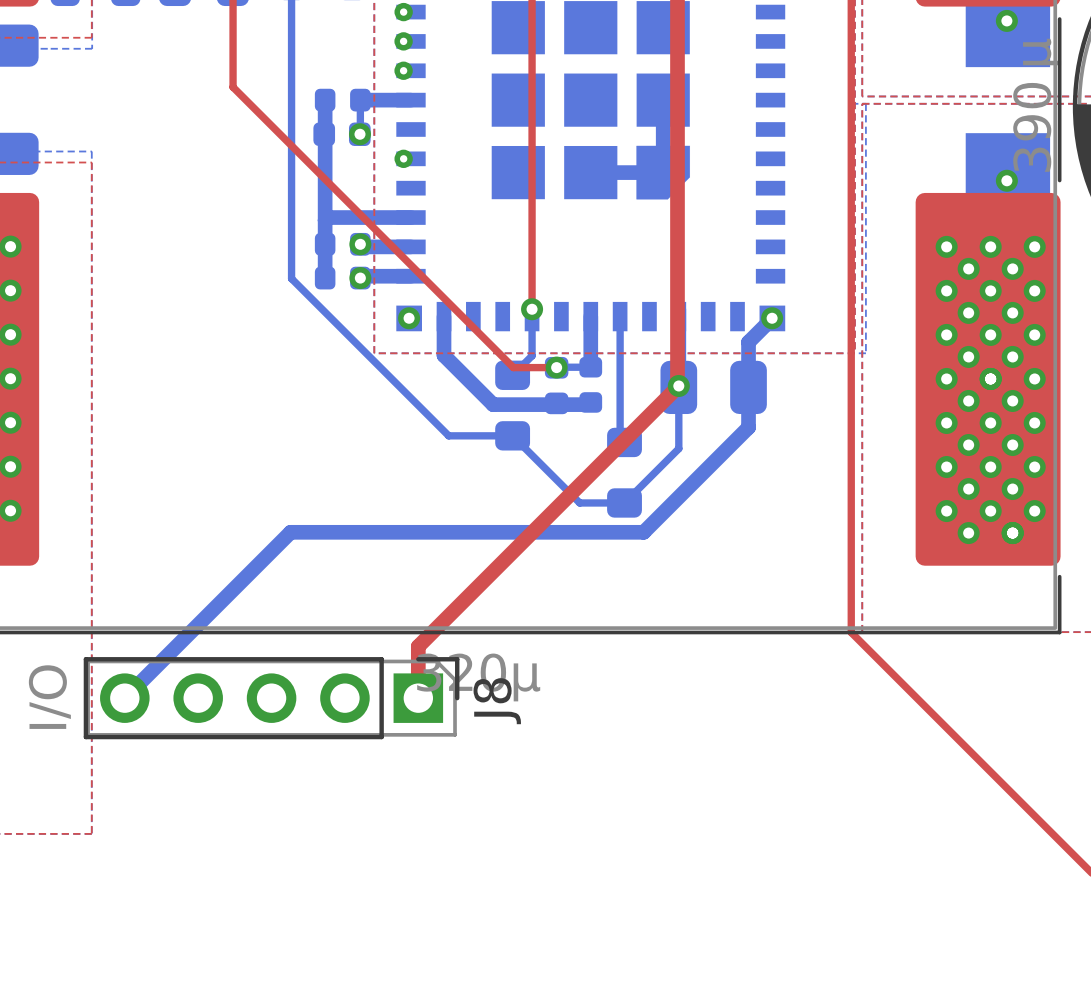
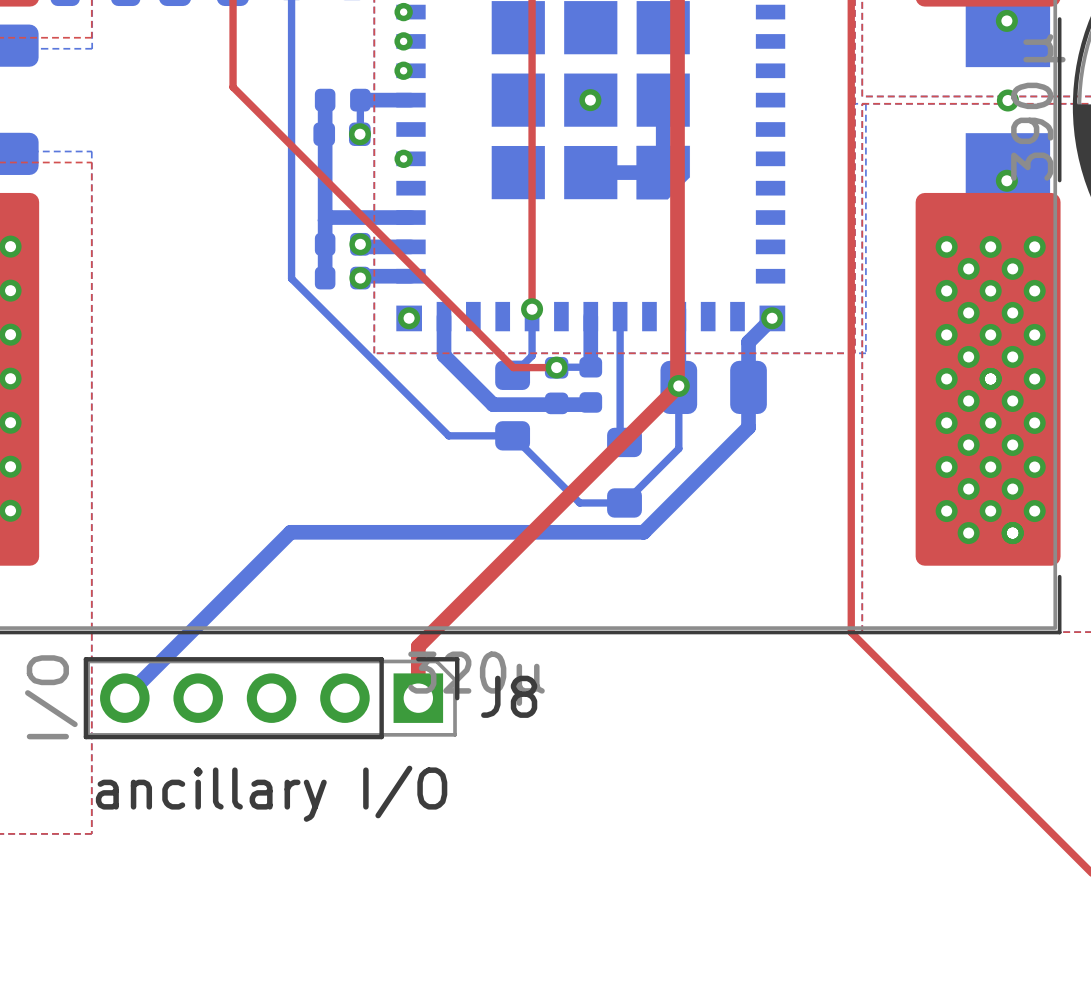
via: none -> (590, 100)
via: none -> (1007, 100)
J8 name rotation: 0° (497, 701) -> 90° clockwise (509, 696)
text: none -> ancillary I/O (271, 793)

